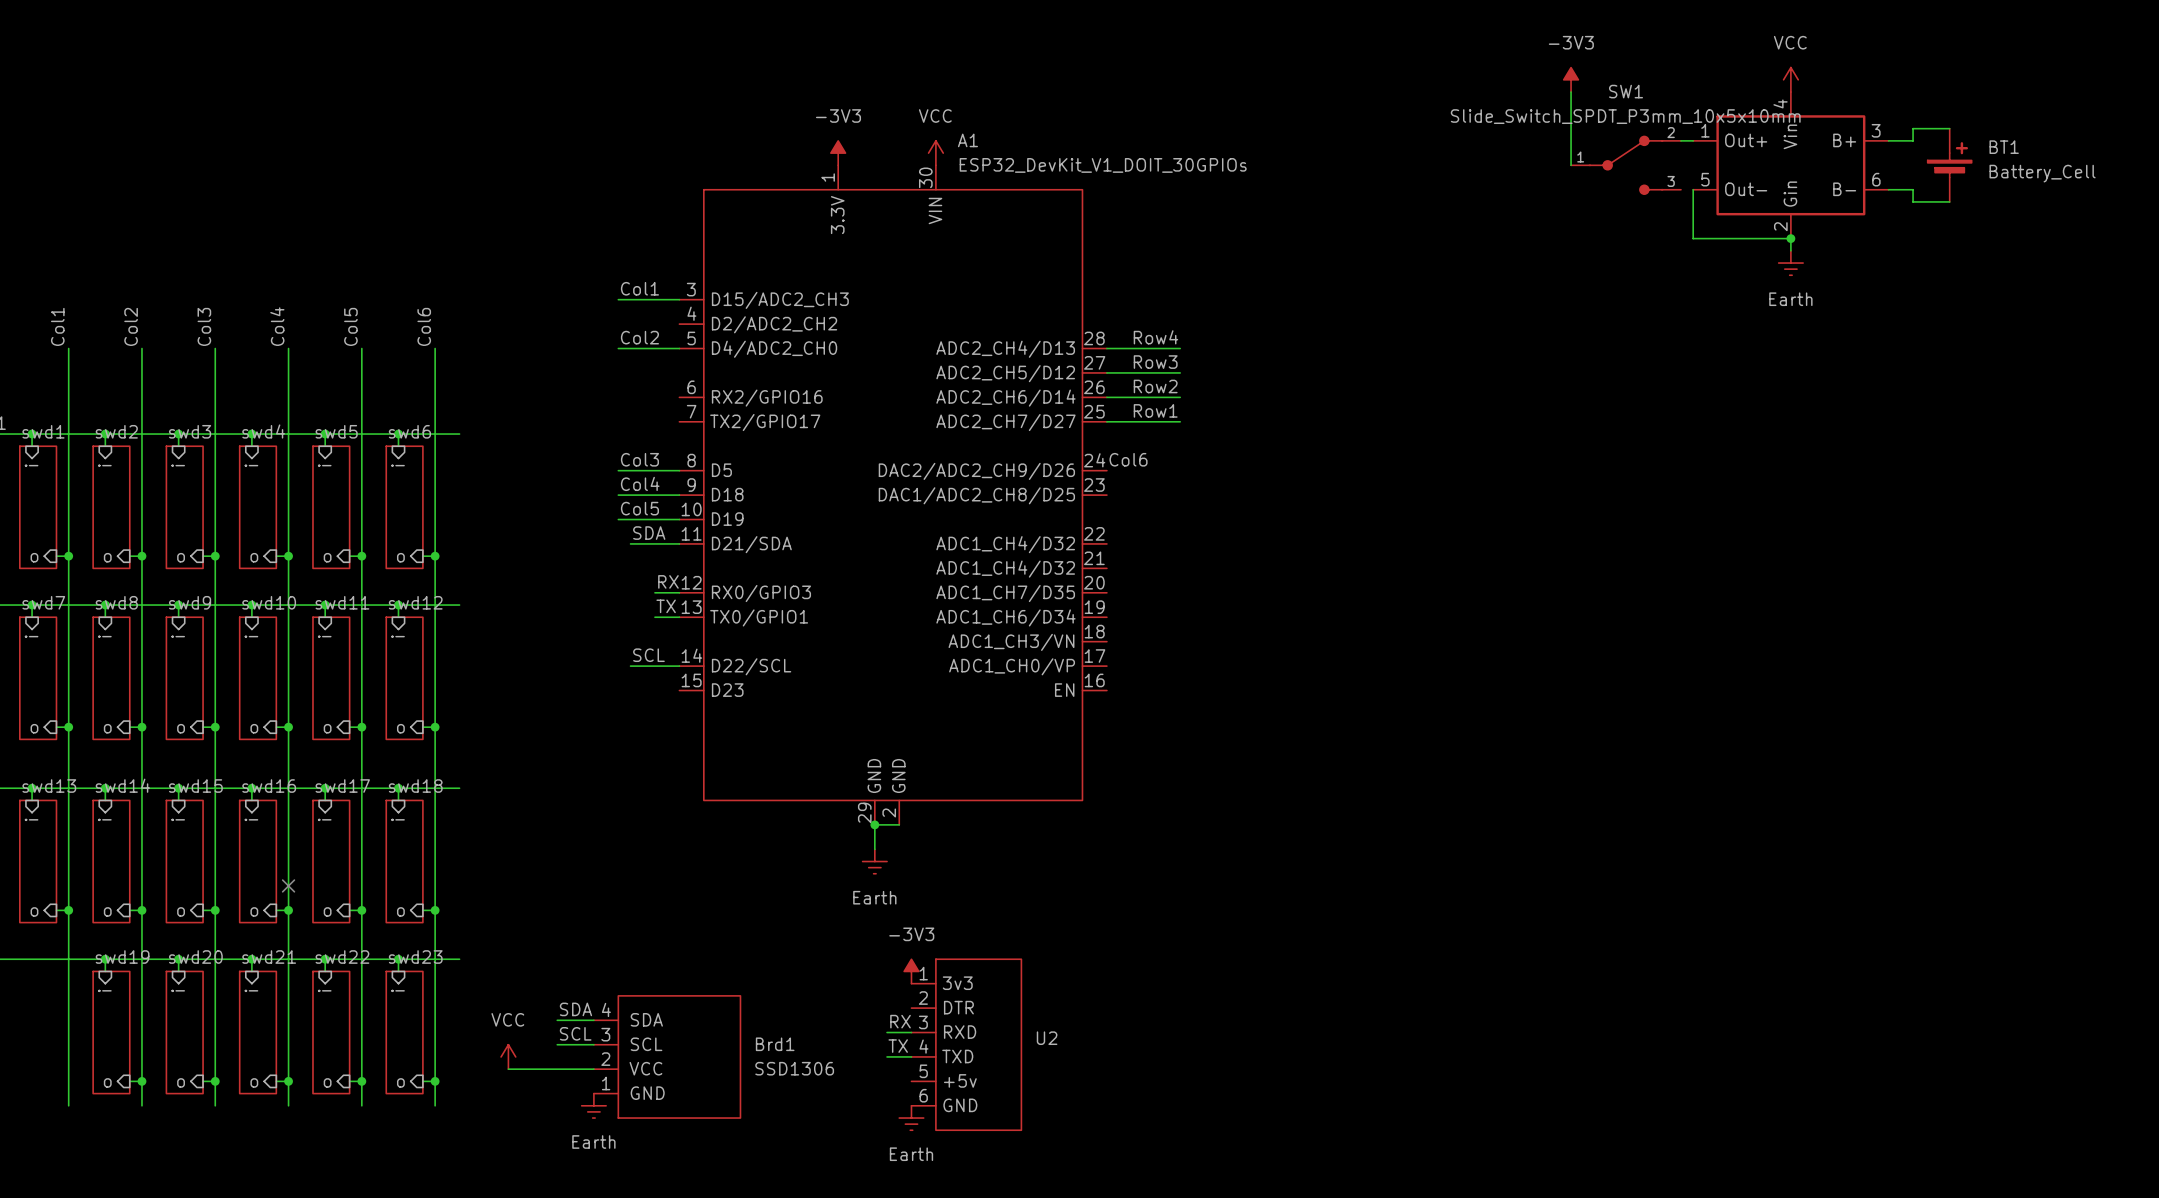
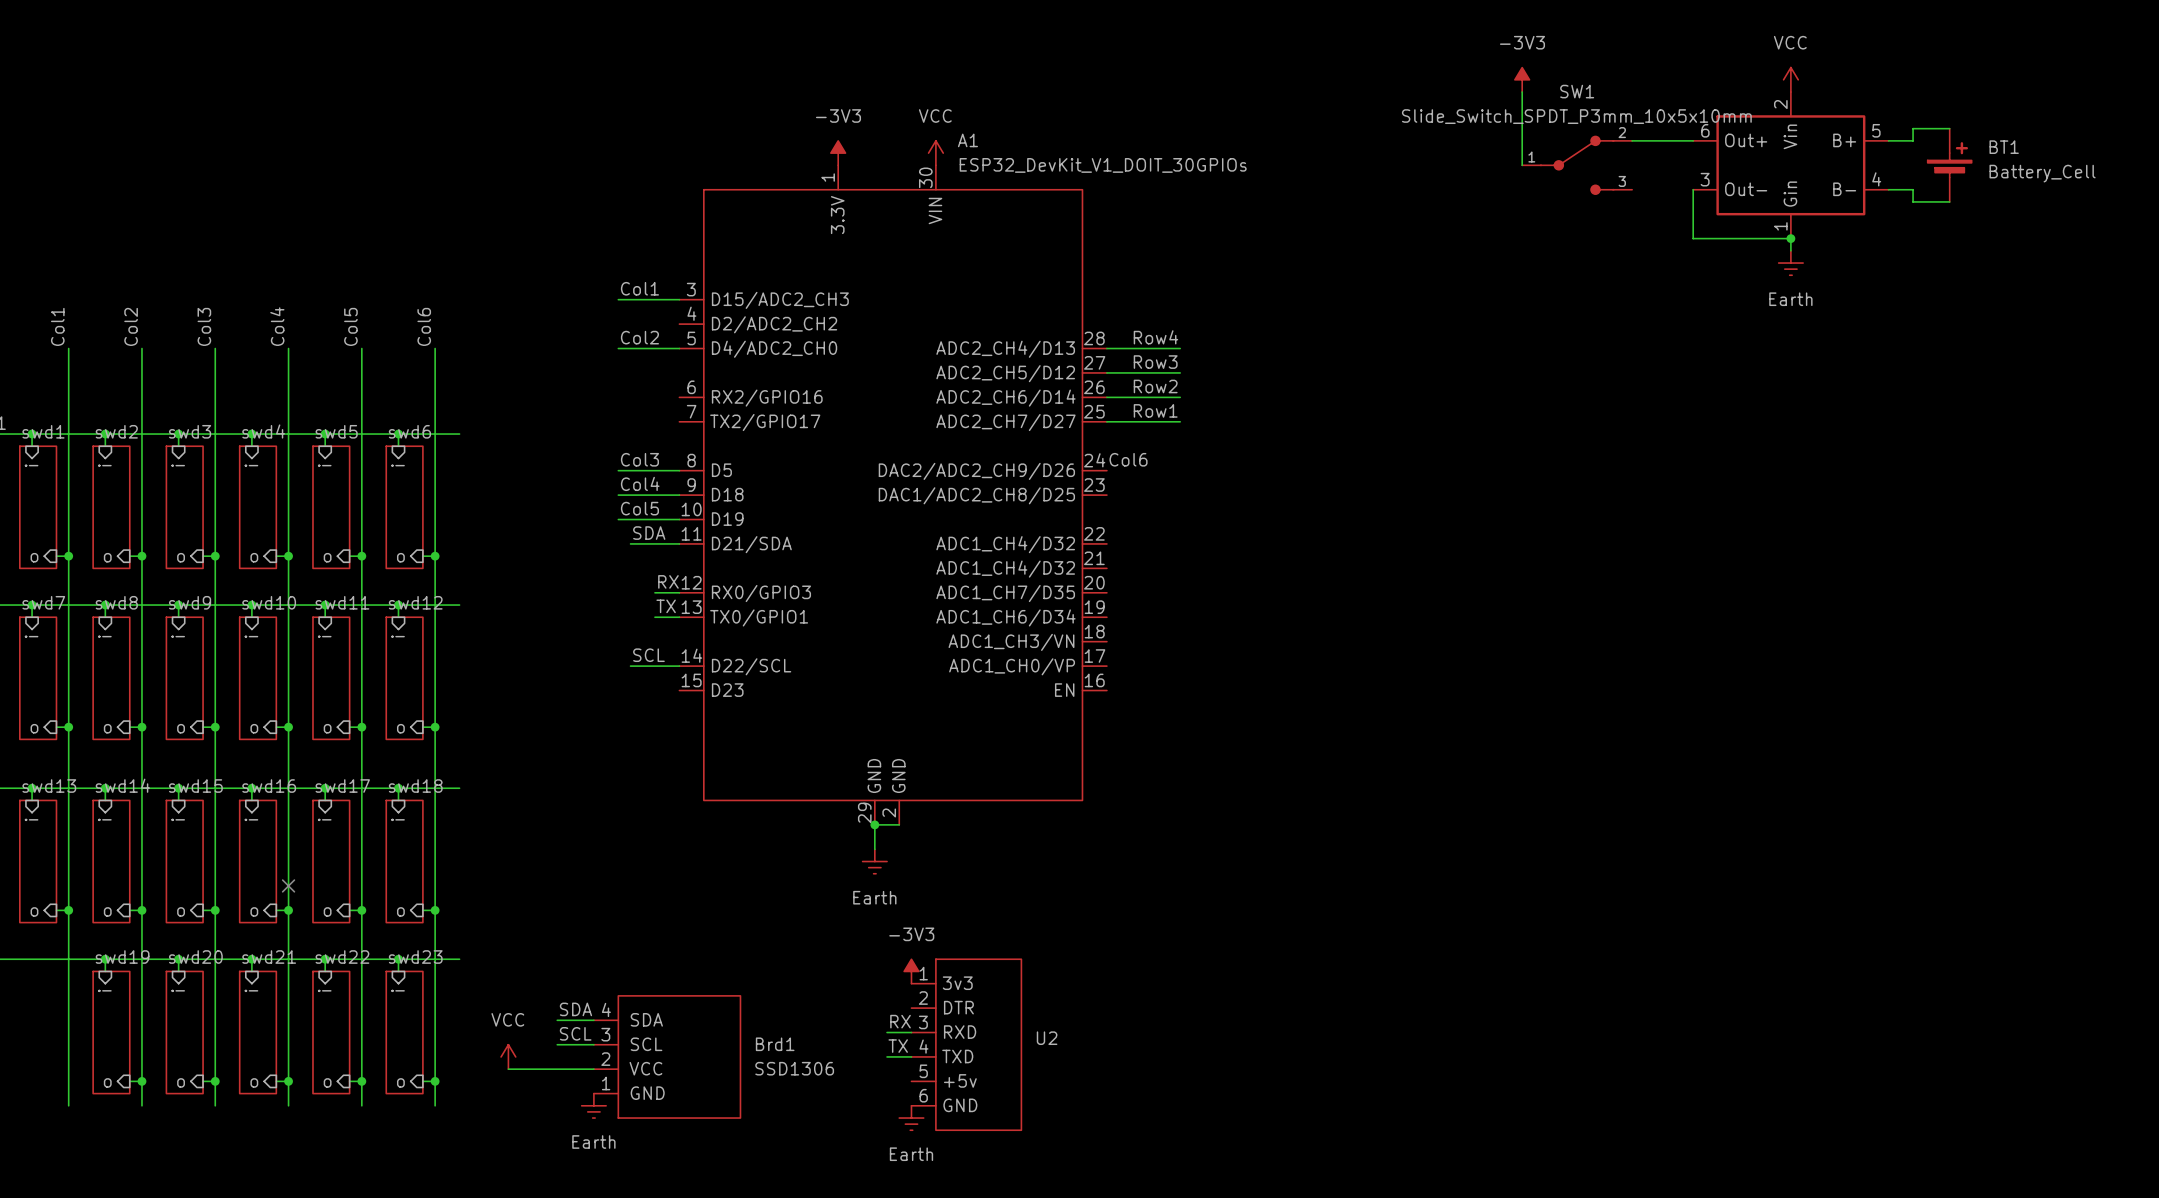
power symbol position: -3V3 (1571, 79) -> -3V3 (1522, 79)
wire: (1571, 92) (1571, 165) -> (1522, 92) (1522, 165)
part pin number: 4 (1780, 103) -> 2 (1780, 104)
part pin number: 1 (1705, 130) -> 6 (1705, 130)
part pin number: 3 (1876, 130) -> 5 (1876, 130)
SW1 position: (1626, 165) -> (1577, 165)
part pin number: 5 (1705, 179) -> 3 (1705, 179)
part pin number: 6 (1876, 179) -> 4 (1876, 179)
part pin number: 2 (1780, 226) -> 1 (1780, 226)

